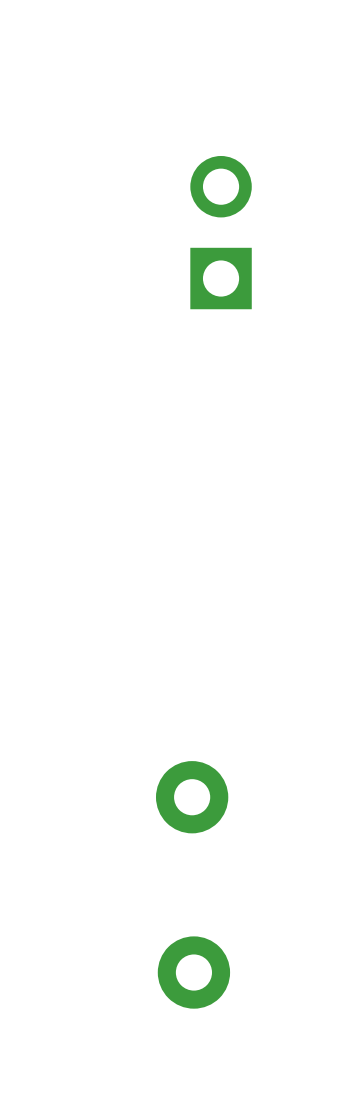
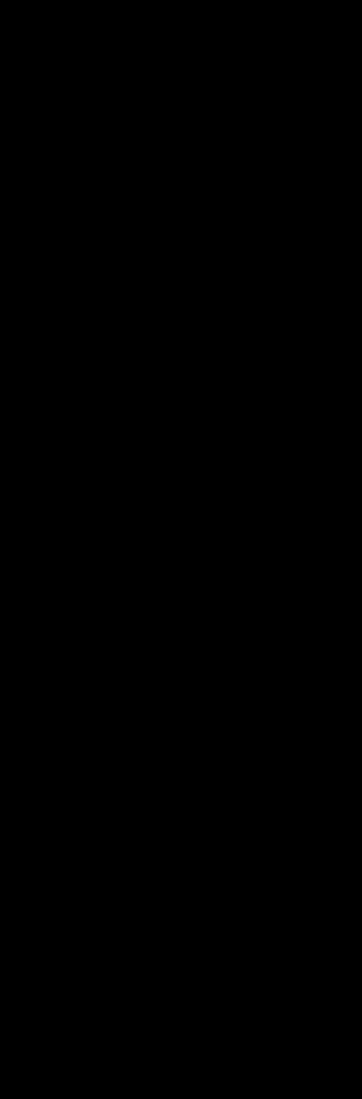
part: (221, 232) -> none
part: (192, 797) -> none
part: (193, 972) -> none

